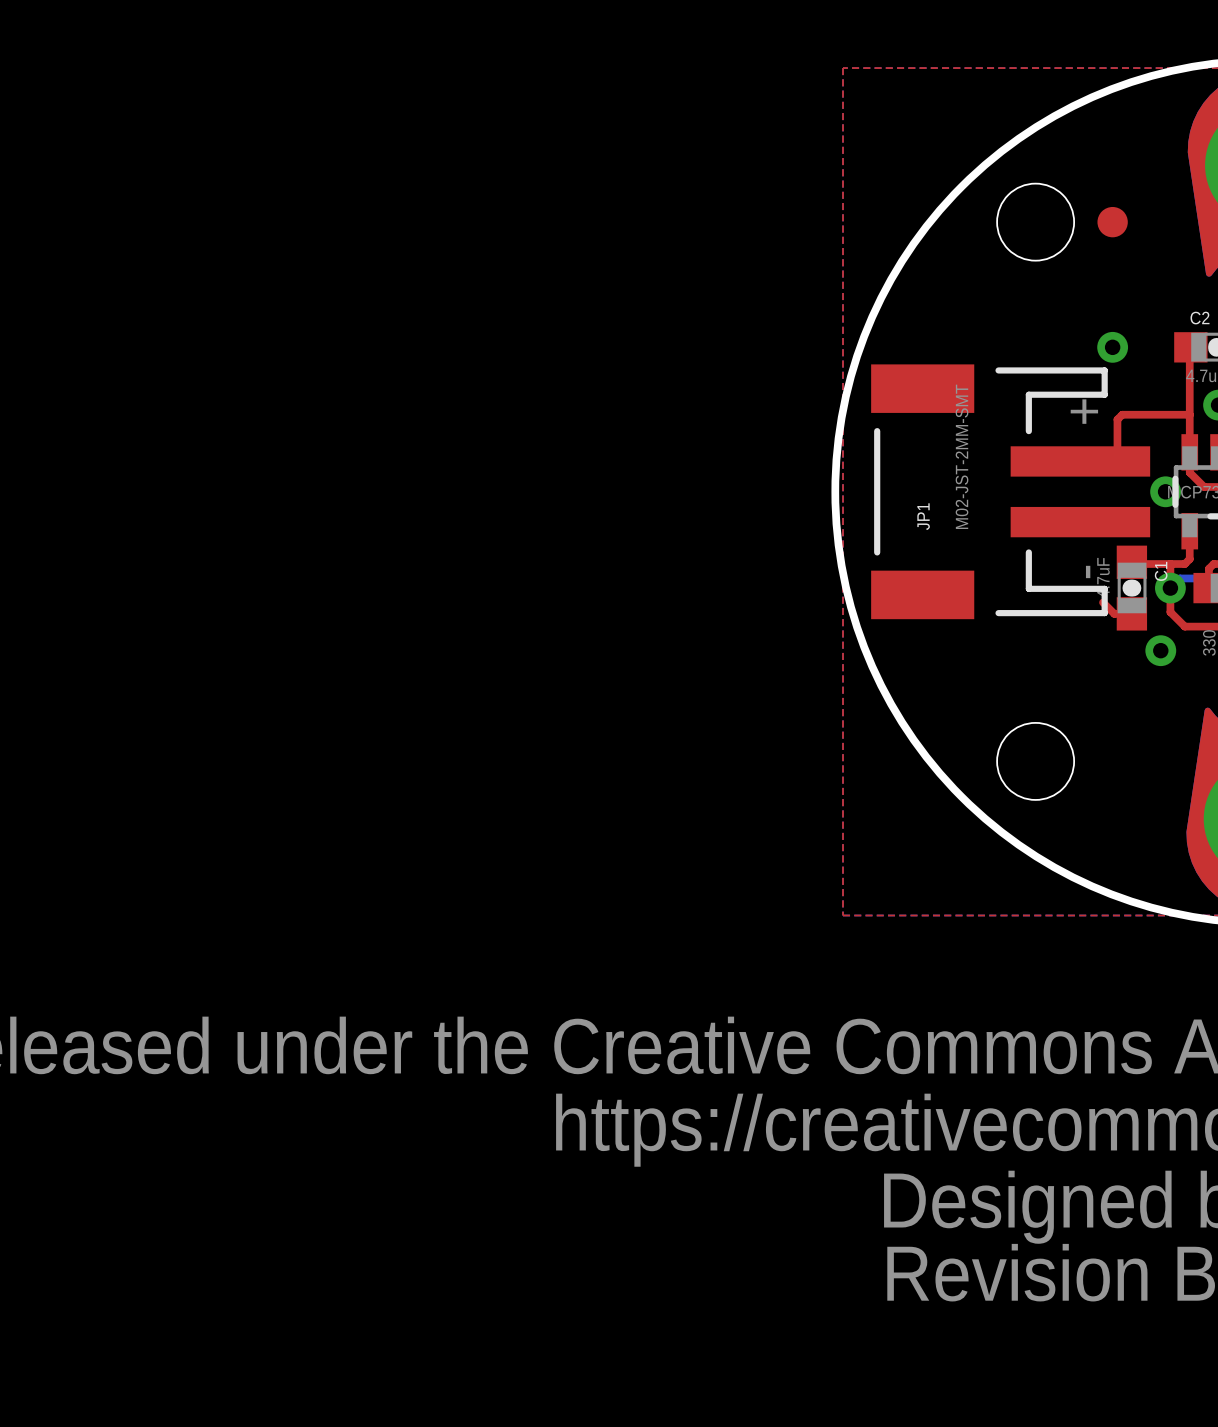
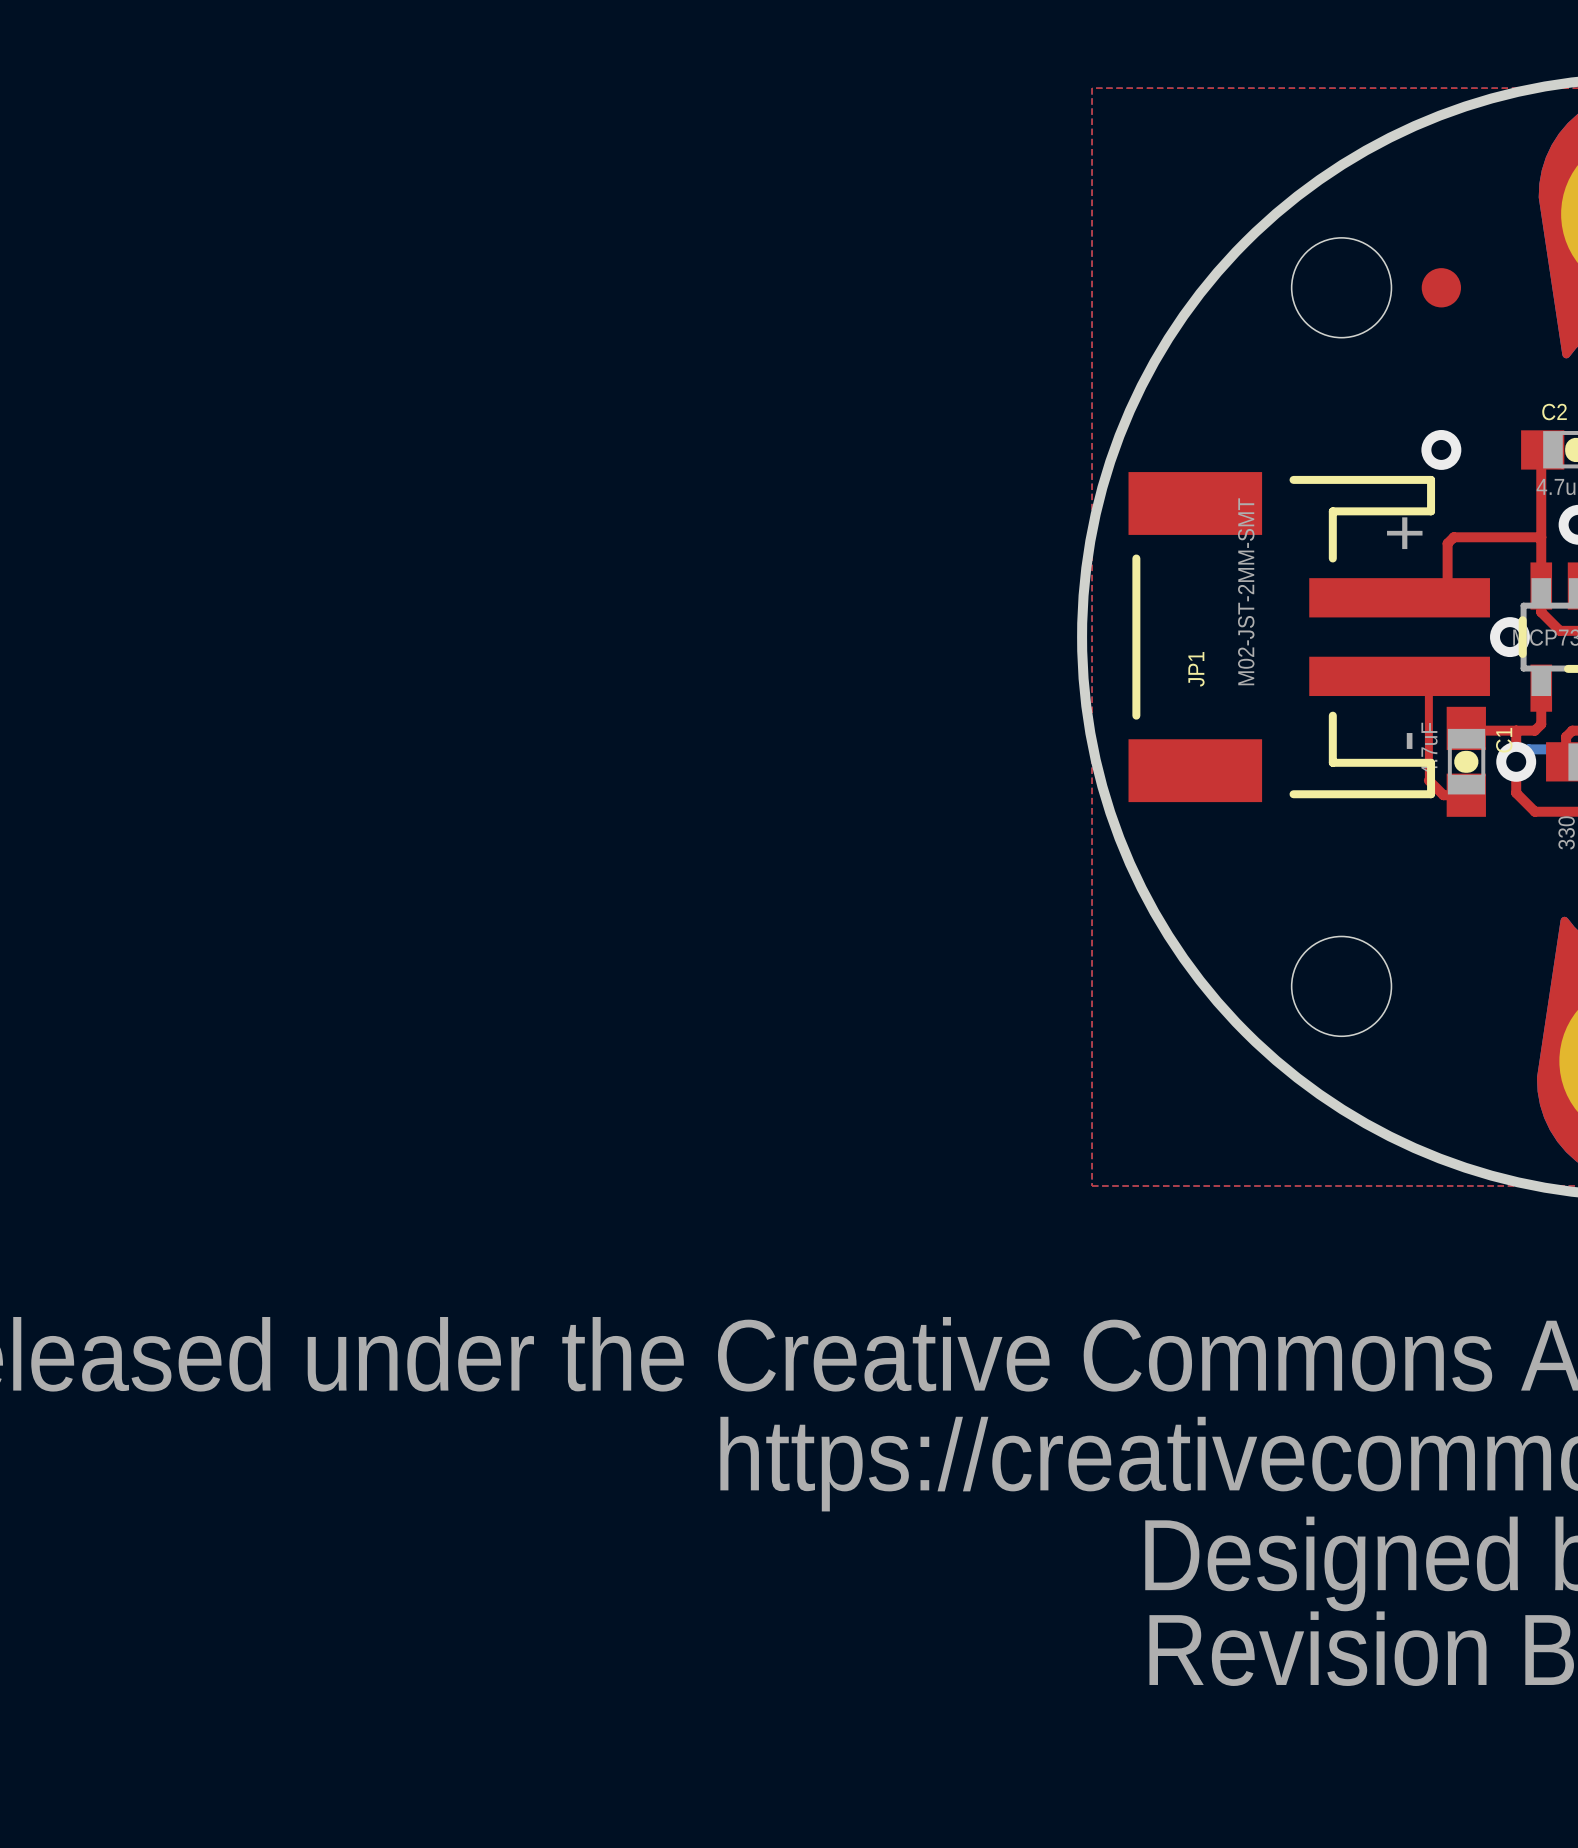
top track: none -> (1403, 680) (1428, 680) (1428, 780)
via: (1160, 650) -> none

